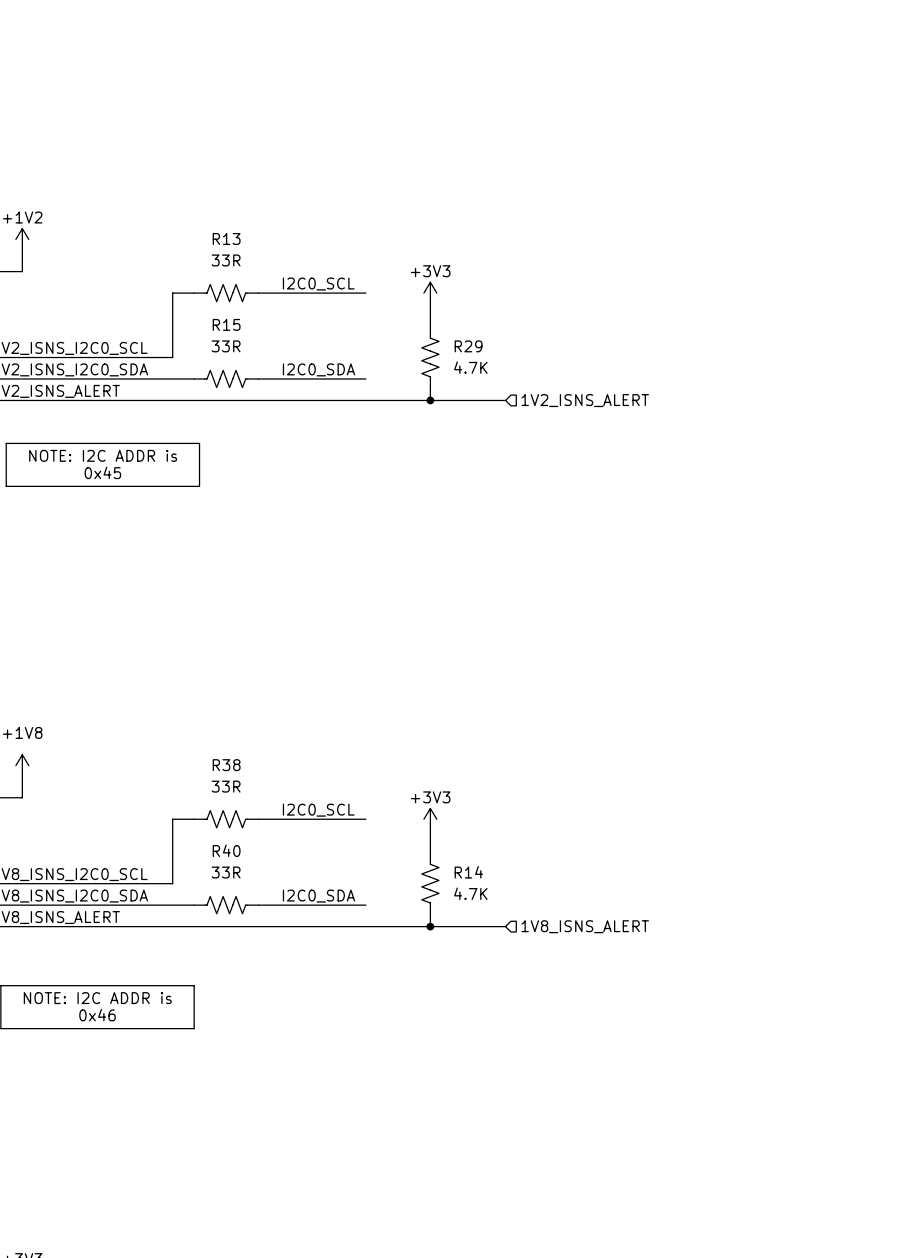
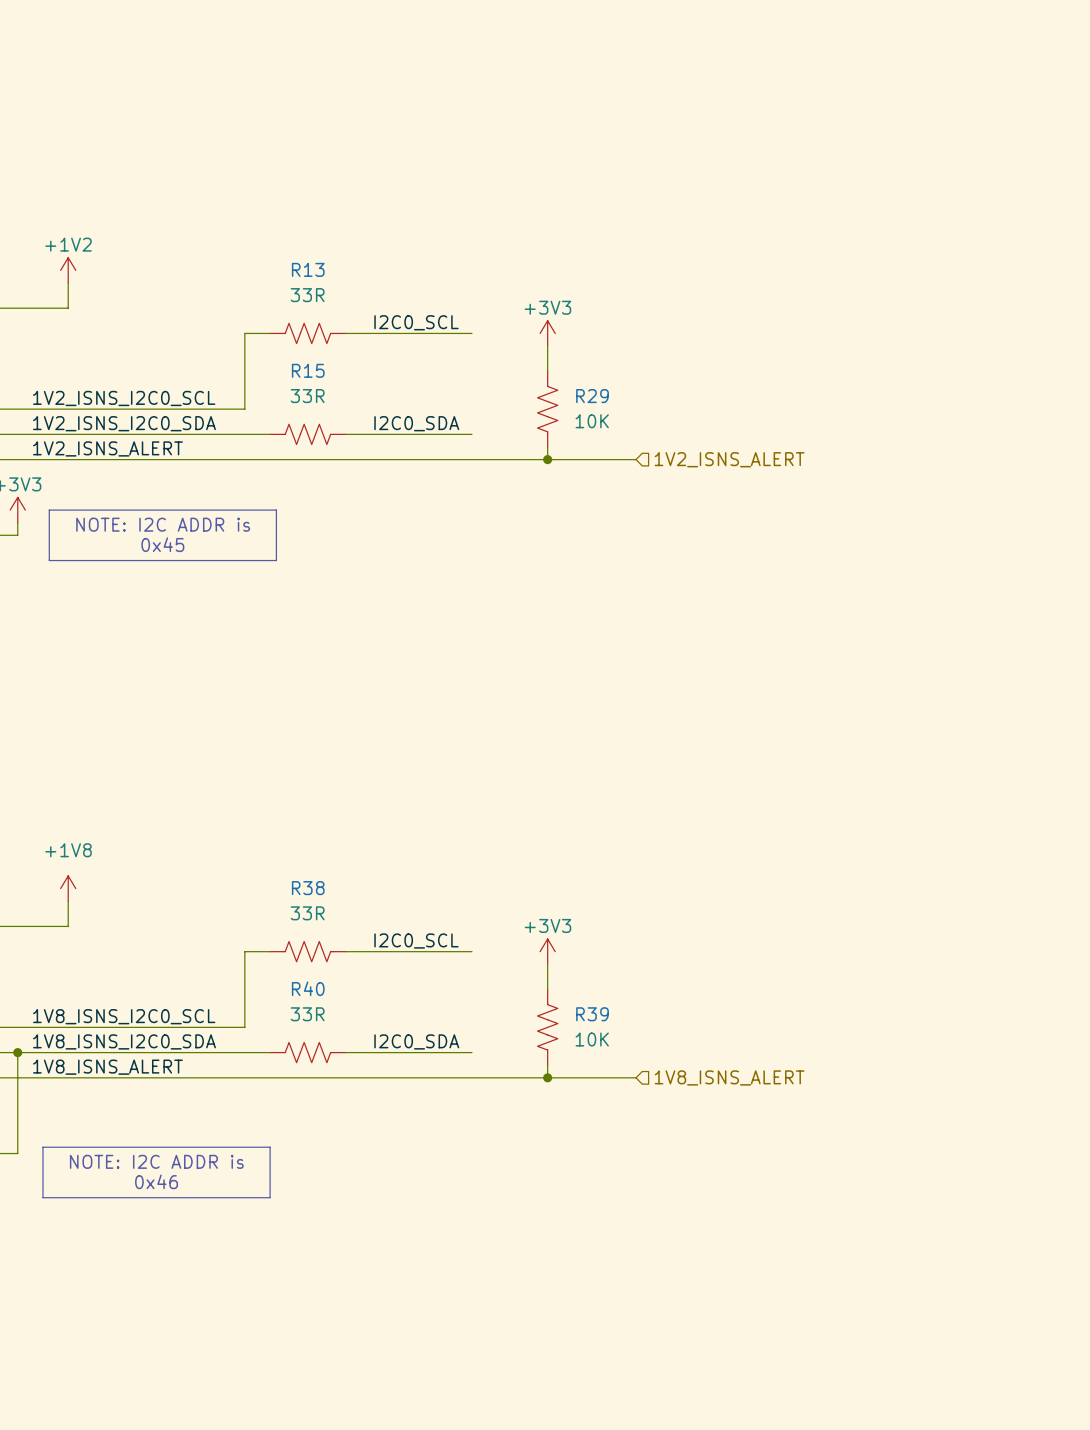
R29 value: 4.7K (470, 367) -> 10K (592, 421)
R14 name: R14 (468, 872) -> R39 (592, 1014)
R14 value: 4.7K (470, 893) -> 10K (592, 1039)

